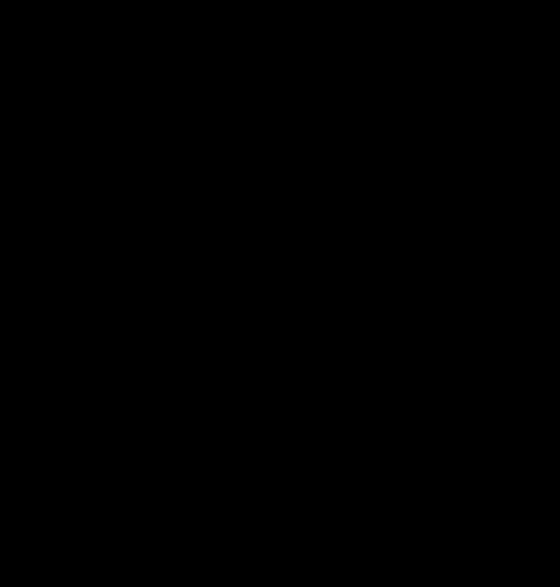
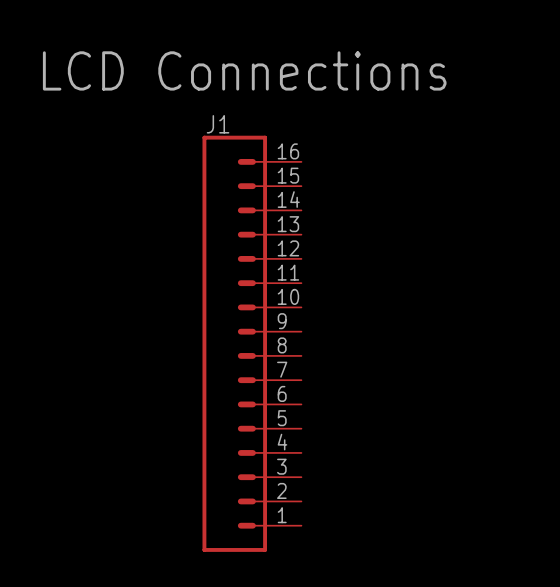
text: none -> LCD Connections (244, 70)
J1: none -> (251, 343)

